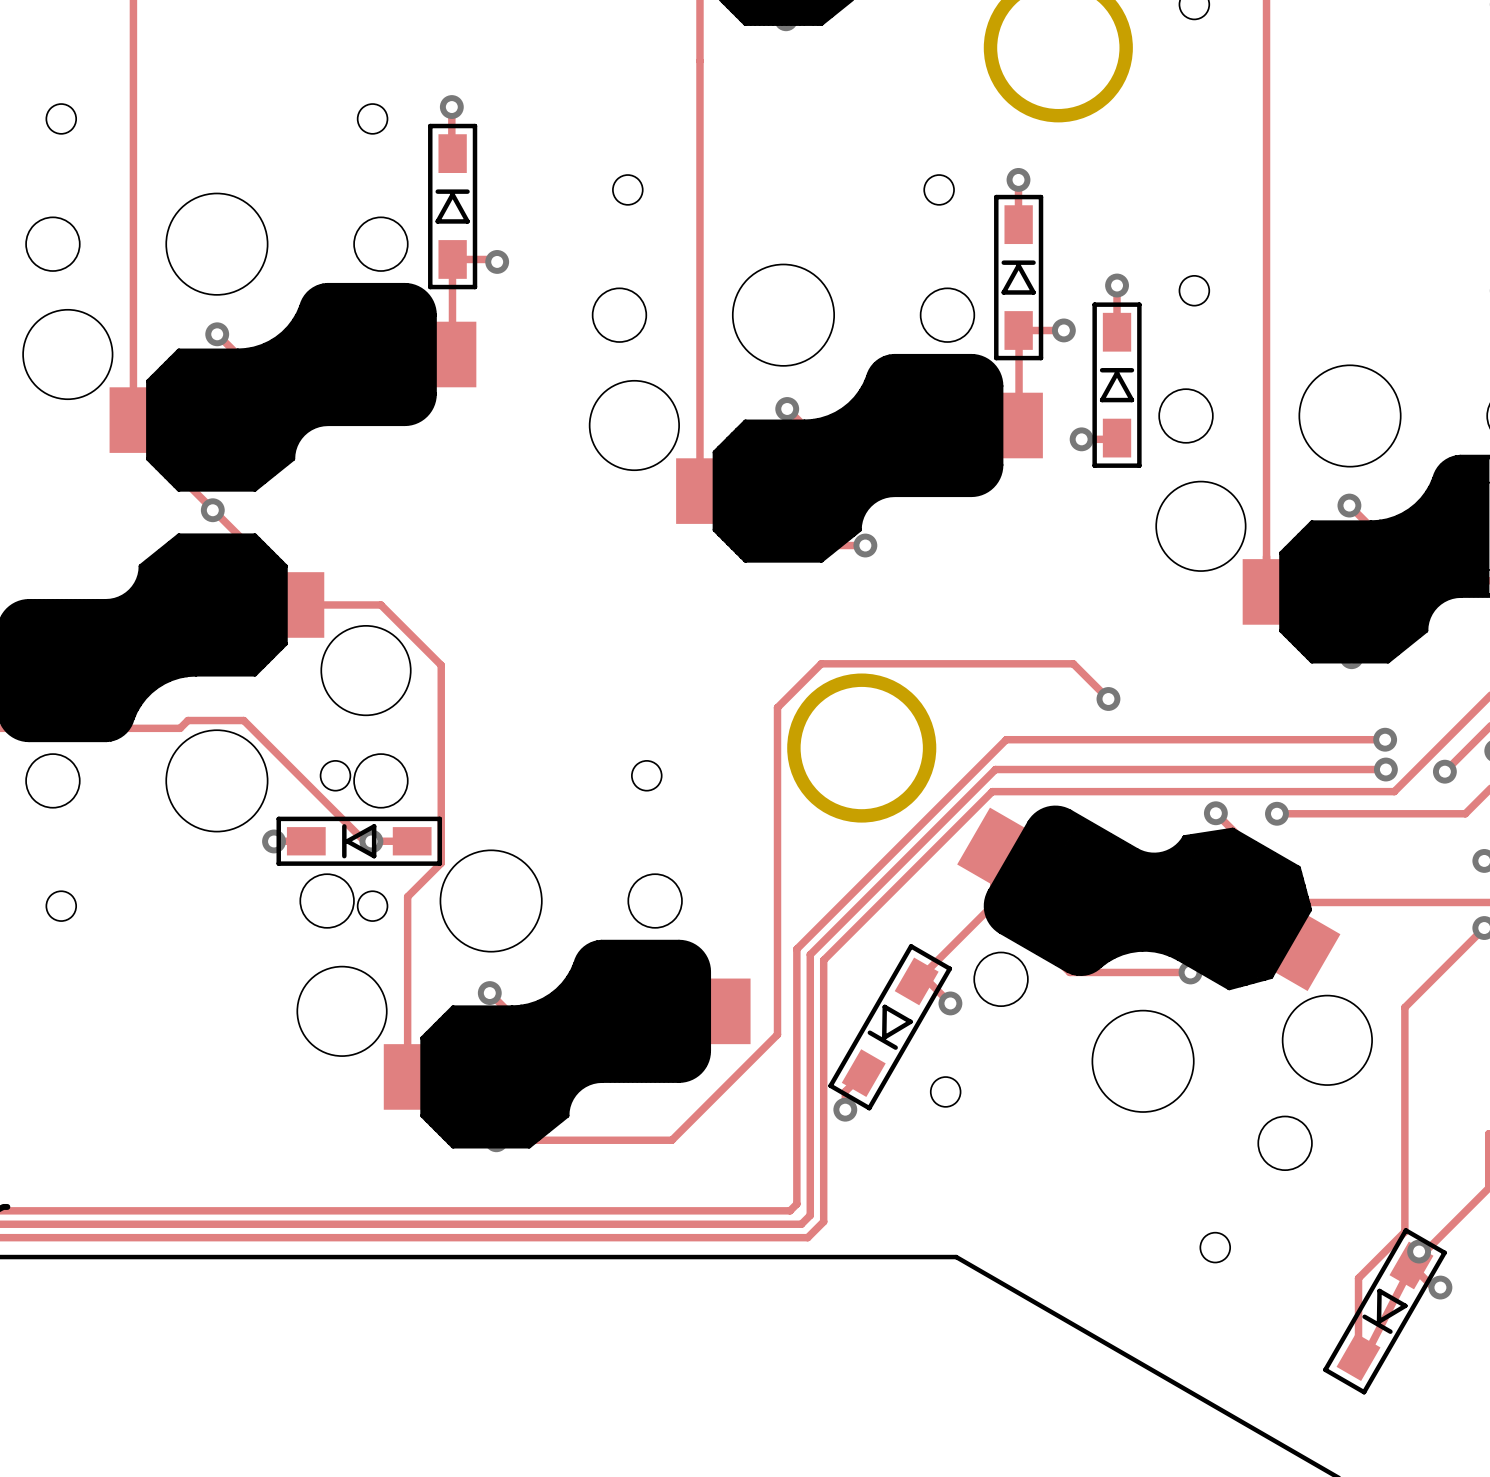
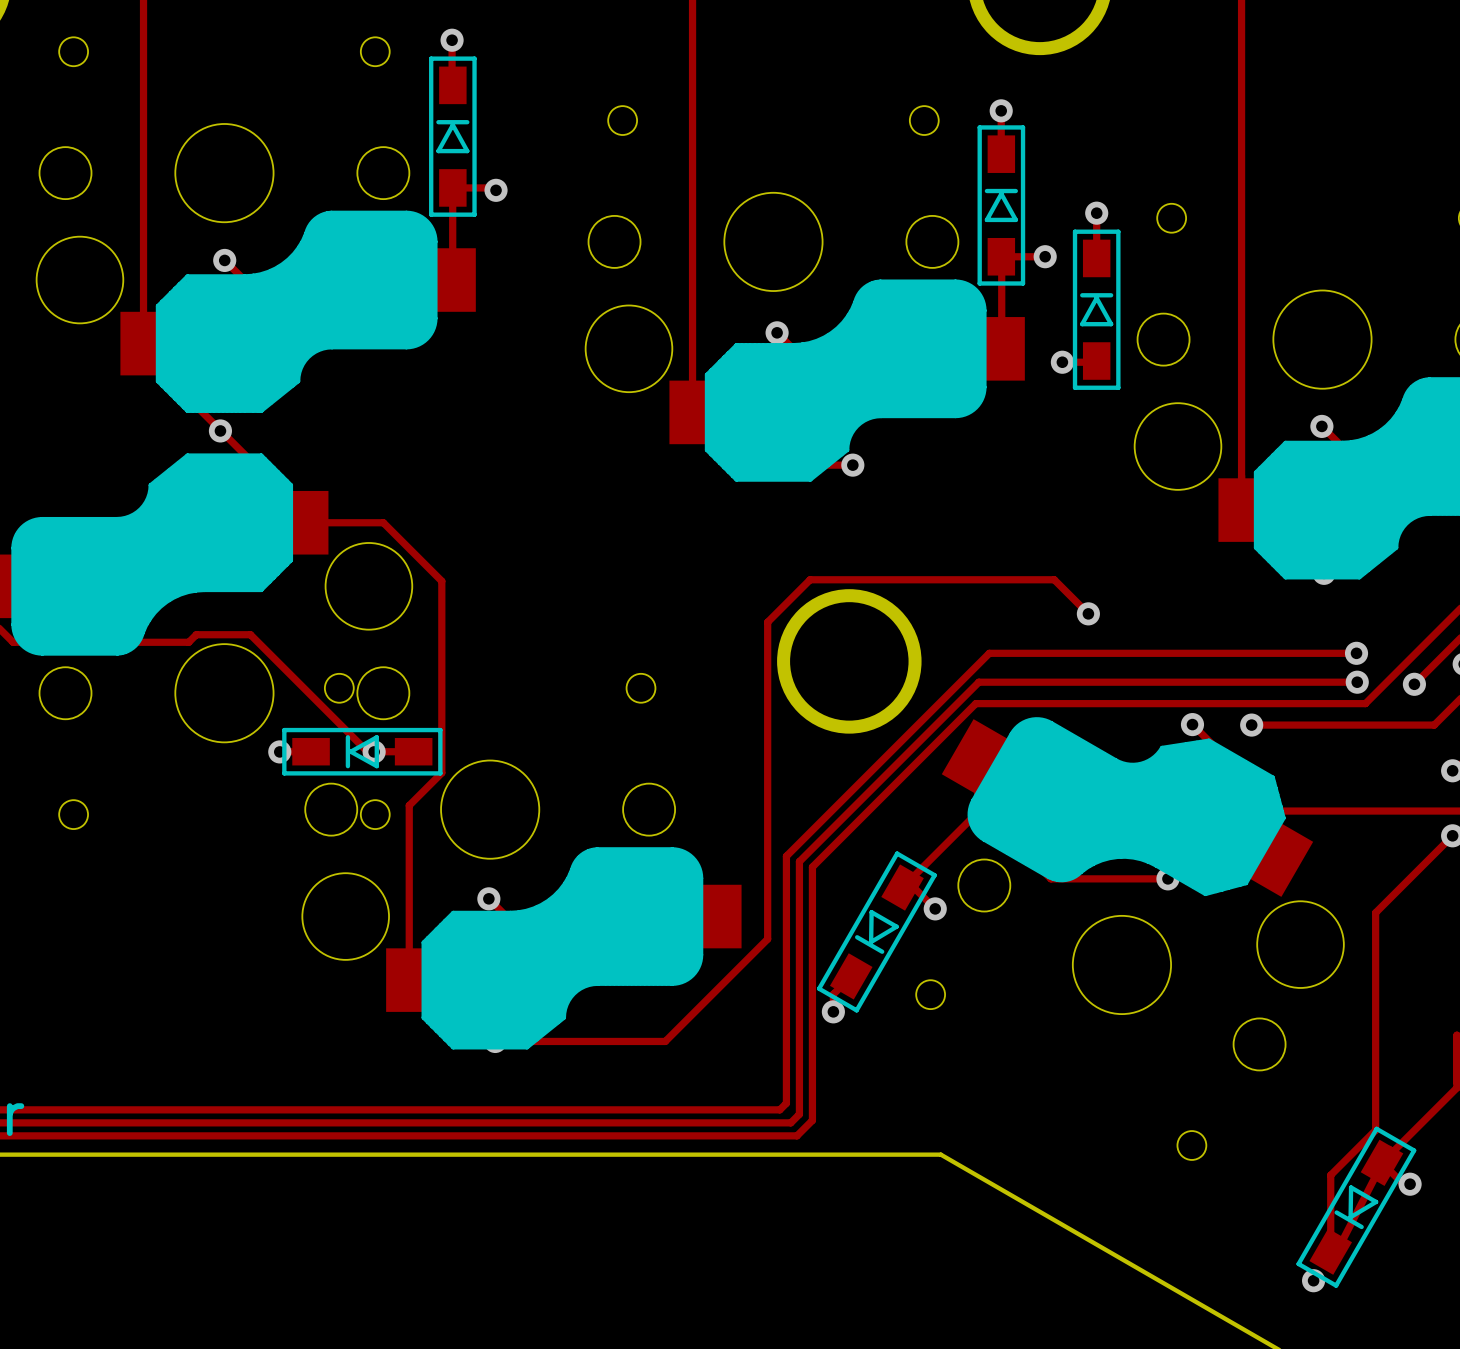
via position: (1419, 1251) -> (1313, 1280)

